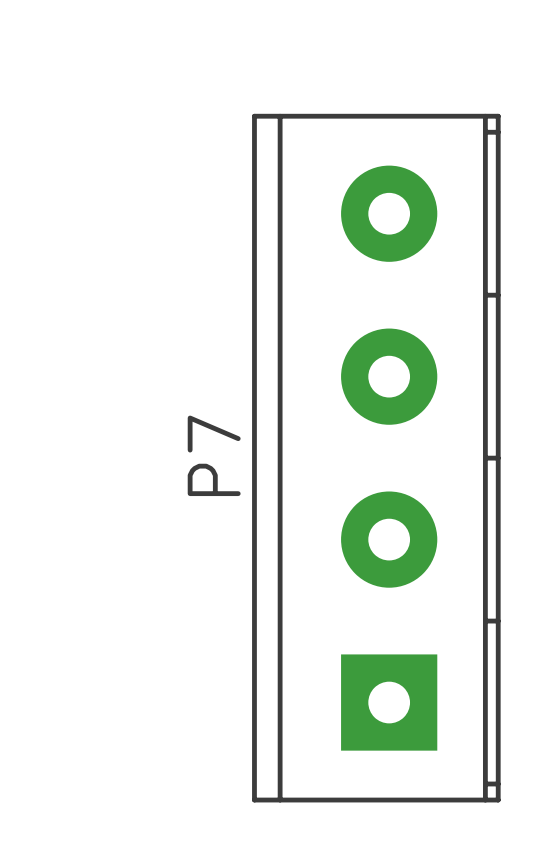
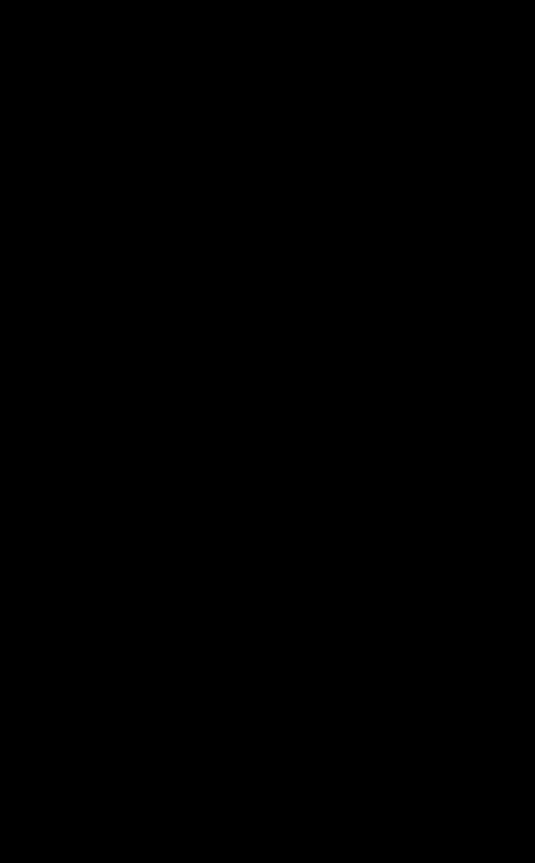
P7: (376, 458) -> none

